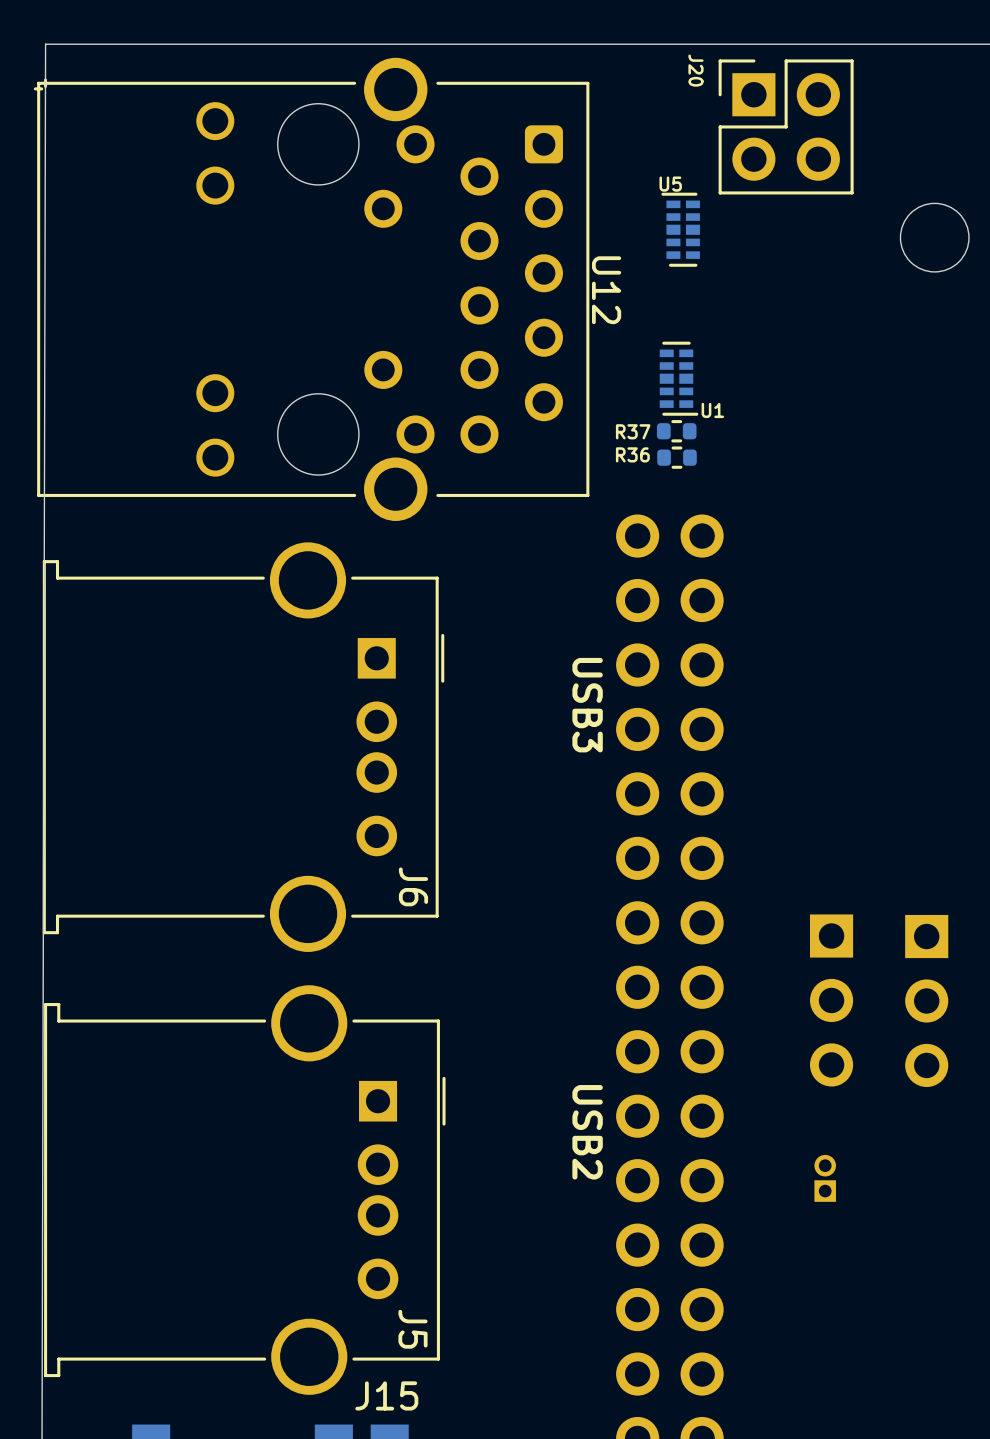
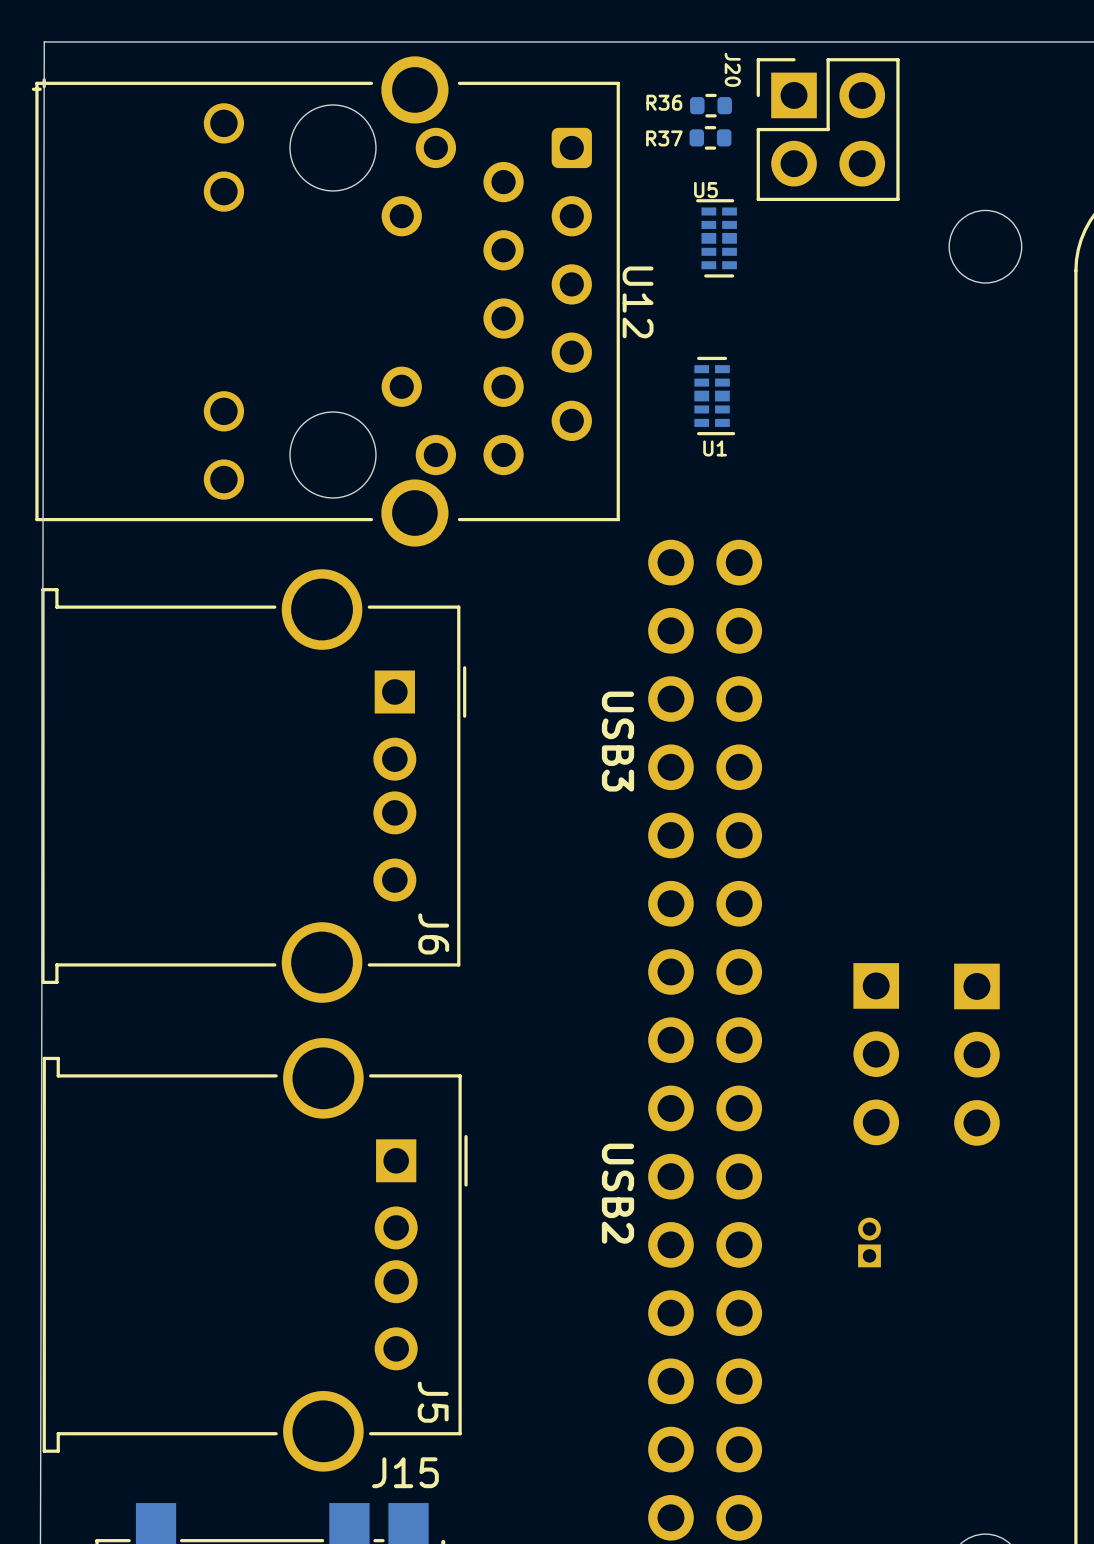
U1 name position: U1 (712, 410) -> U1 (715, 448)
R37 position: (676, 431) -> (710, 137)
R36 position: (676, 457) -> (711, 105)

